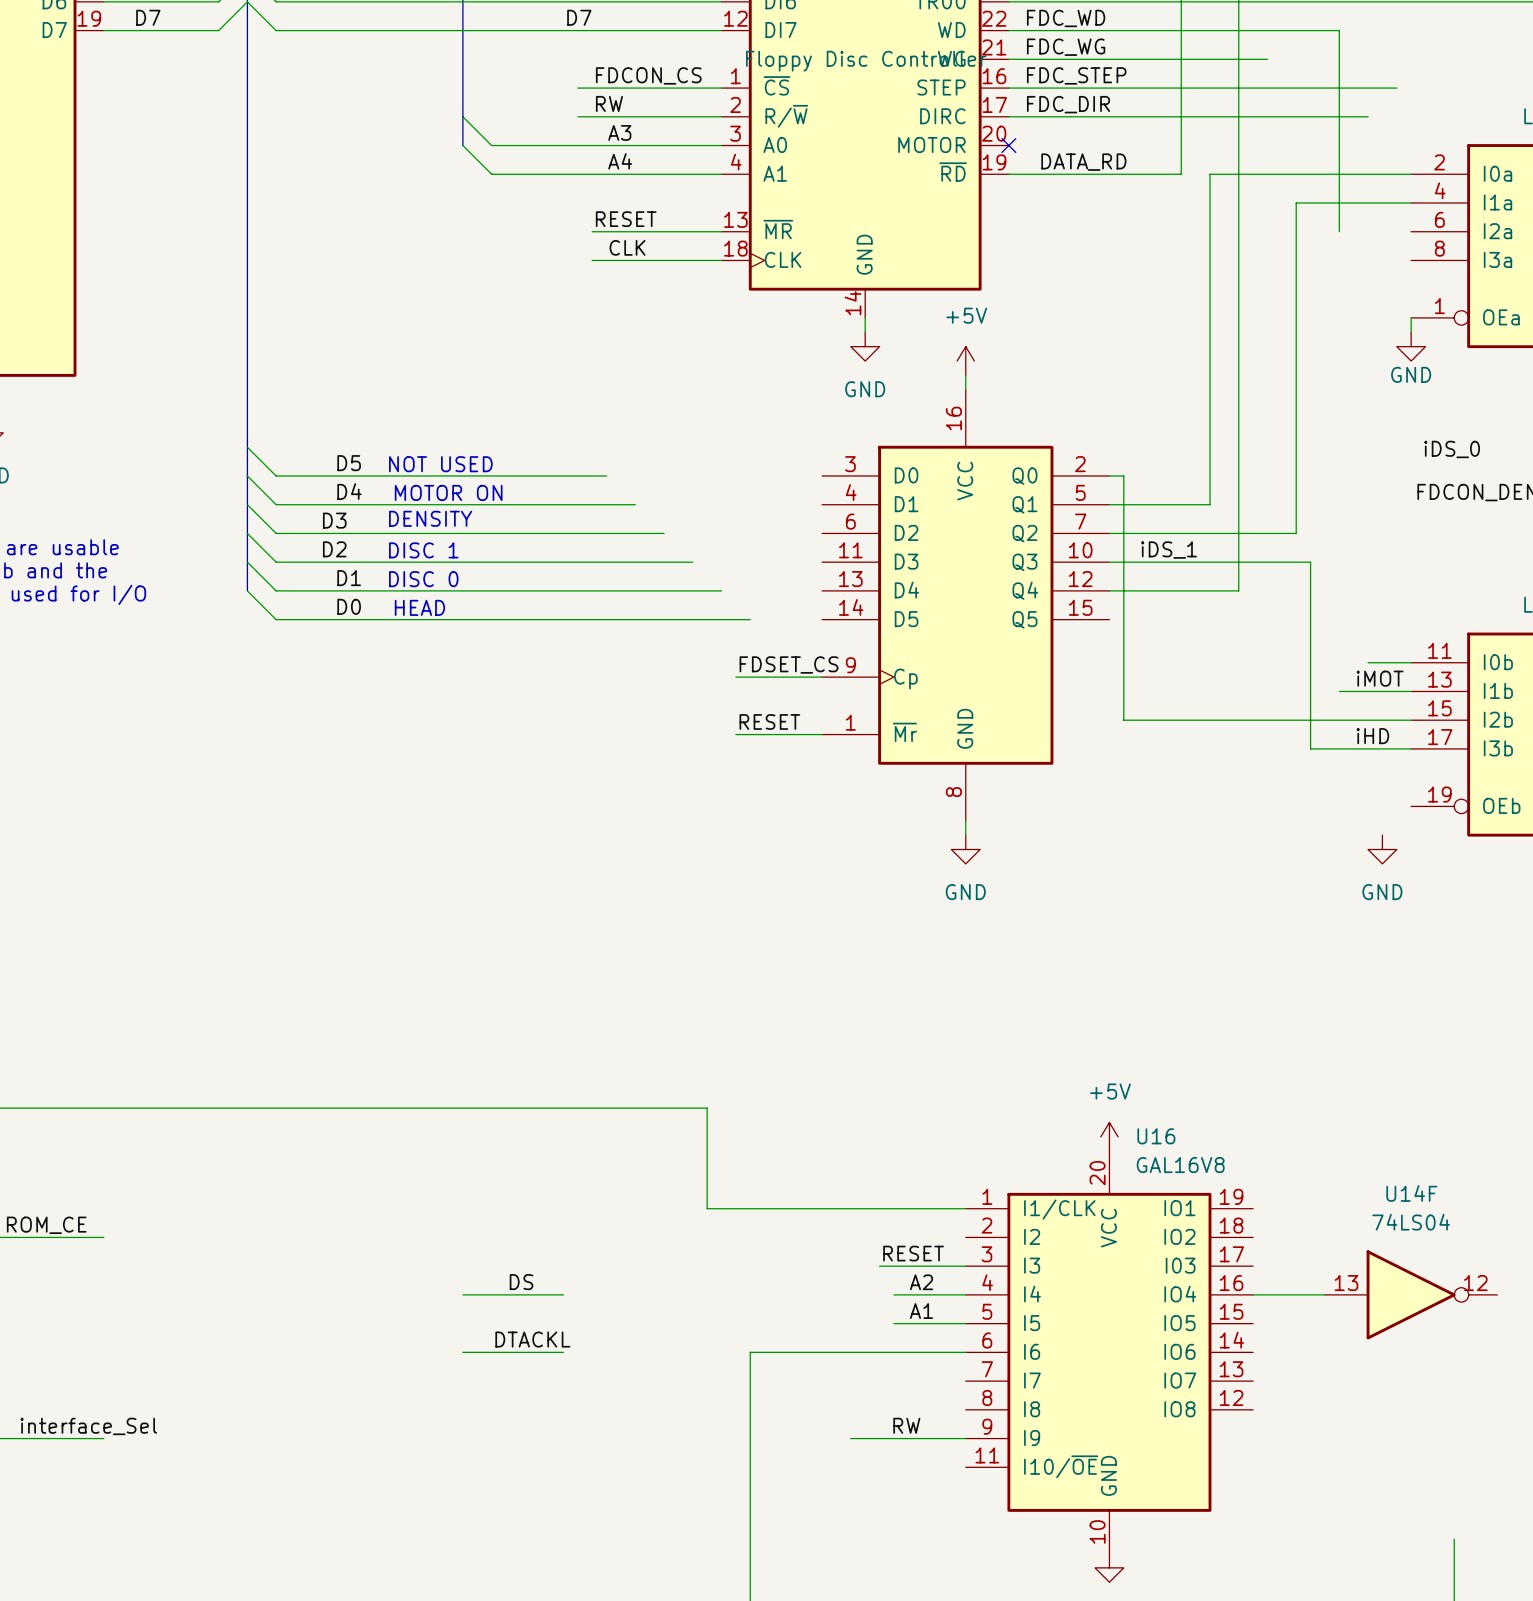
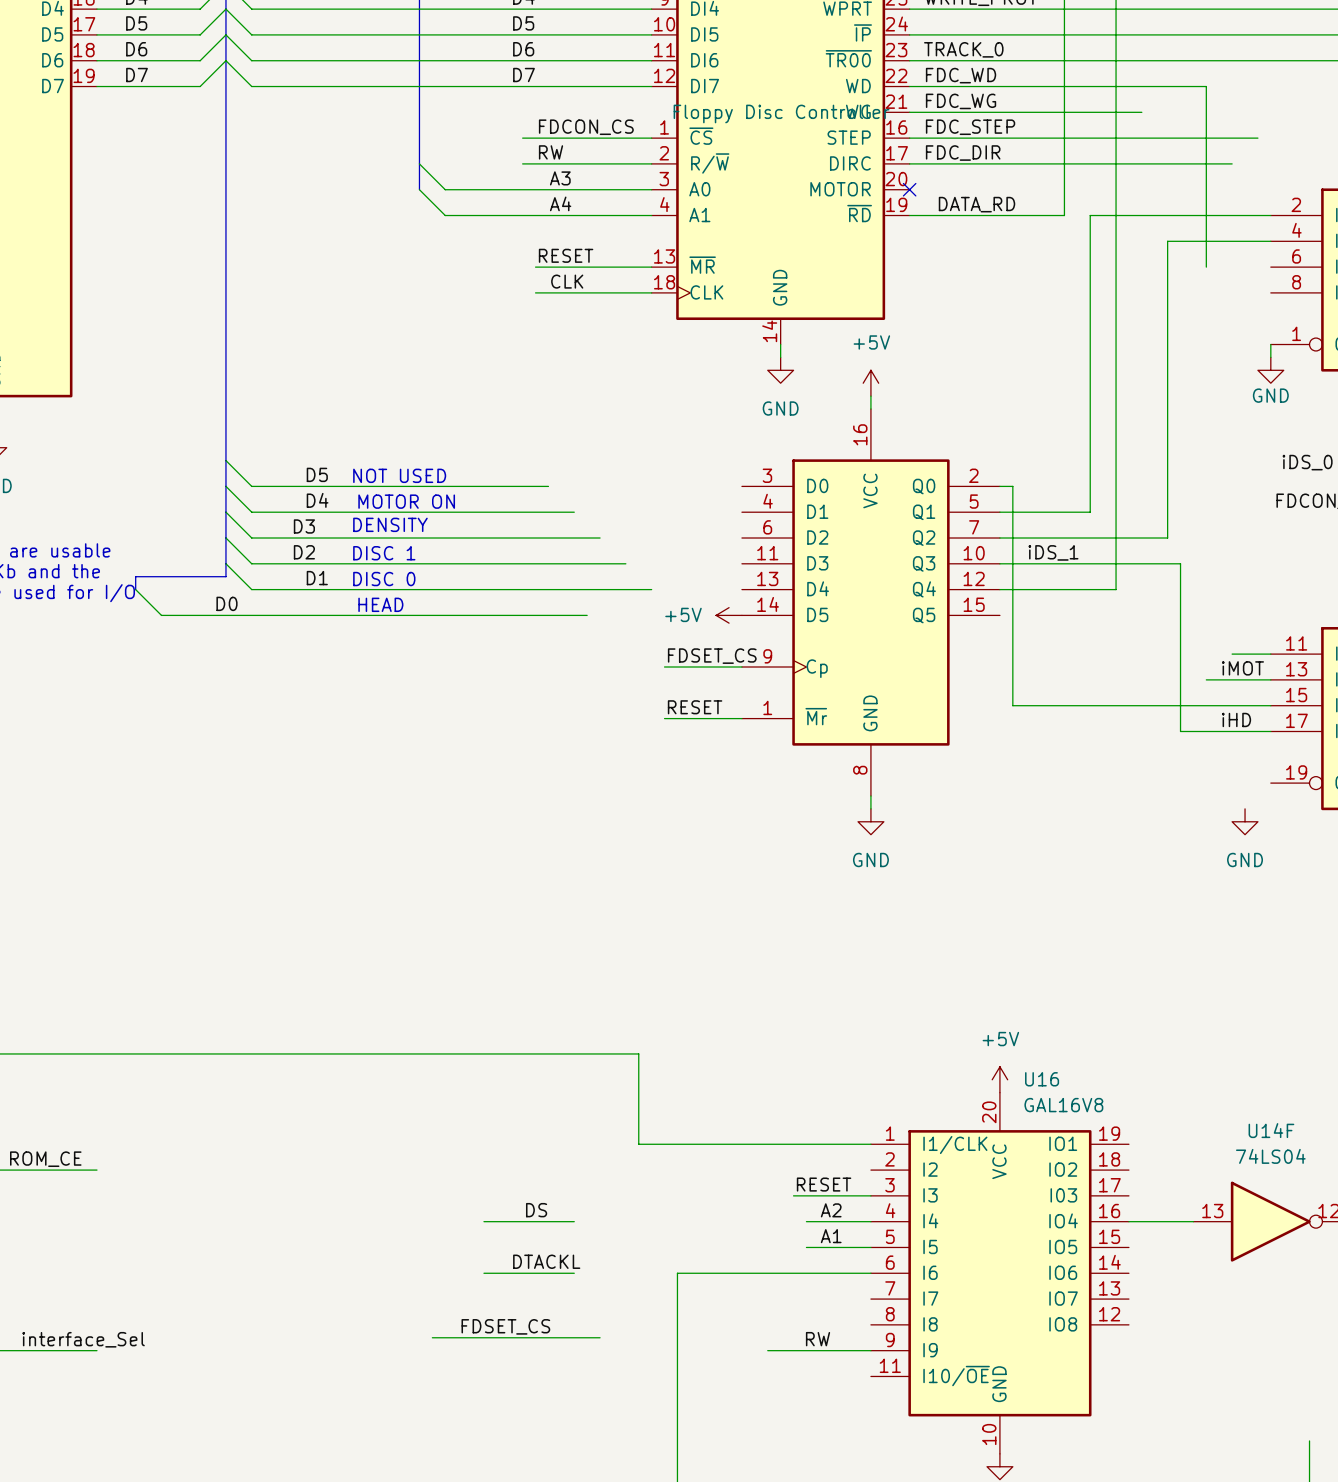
bus: (247, 576) (247, 590) -> (225, 576) (135, 576) (135, 589)
wire: (247, 590) (276, 619) -> (135, 589) (161, 615) (251, 615)
label position: D0 (349, 606) -> D0 (226, 603)
wire: (649, 619) (750, 619) -> none
power symbol: none -> +5V (729, 615)
label position: DS (521, 1282) -> DS (536, 1210)
wire: (462, 1294) (534, 1294) -> (509, 1221) (574, 1221)
label position: DTACKL (532, 1339) -> DTACKL (546, 1261)
wire: (462, 1352) (534, 1352) -> (509, 1273) (574, 1273)
label: none -> FDSET_CS (505, 1326)
wire: none -> (432, 1337) (600, 1337)

